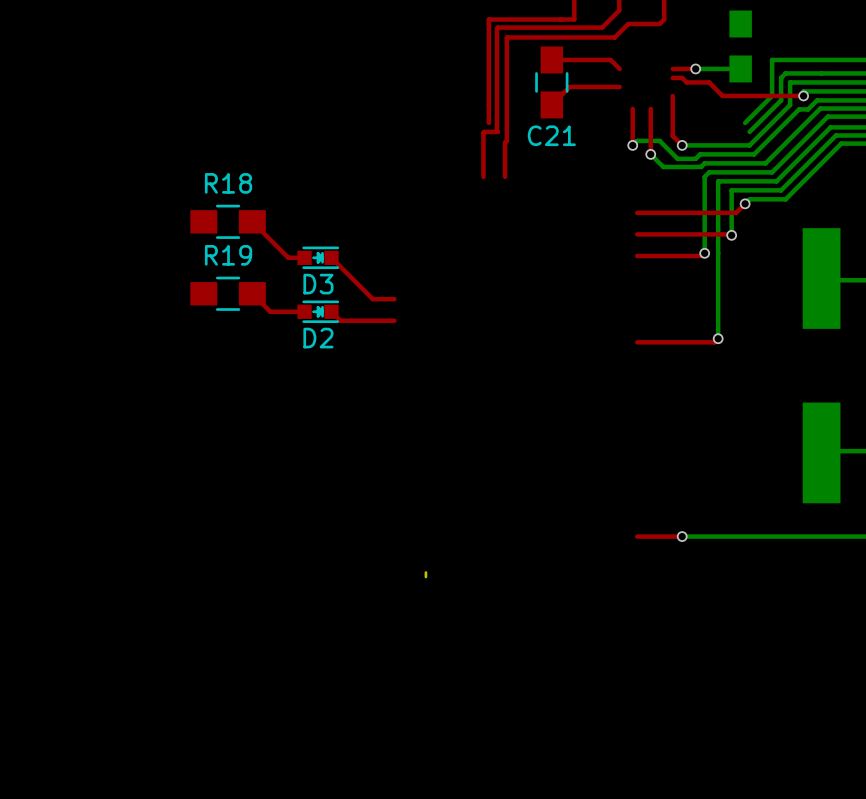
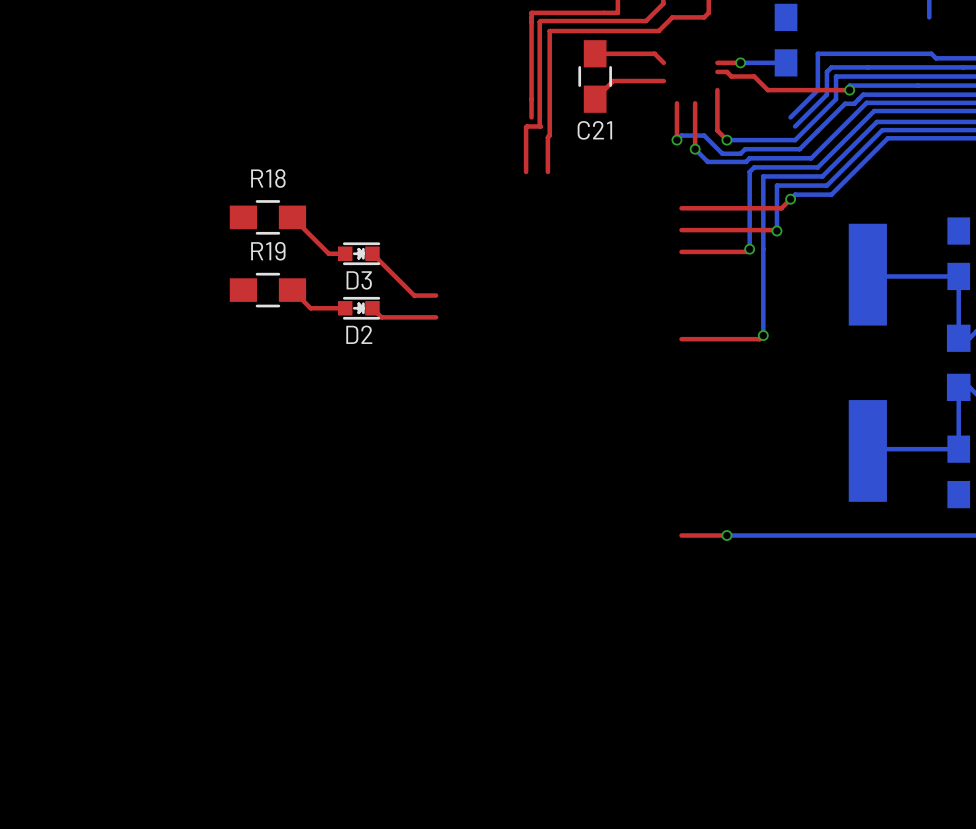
board edge: (425, 572) (425, 577) -> none

